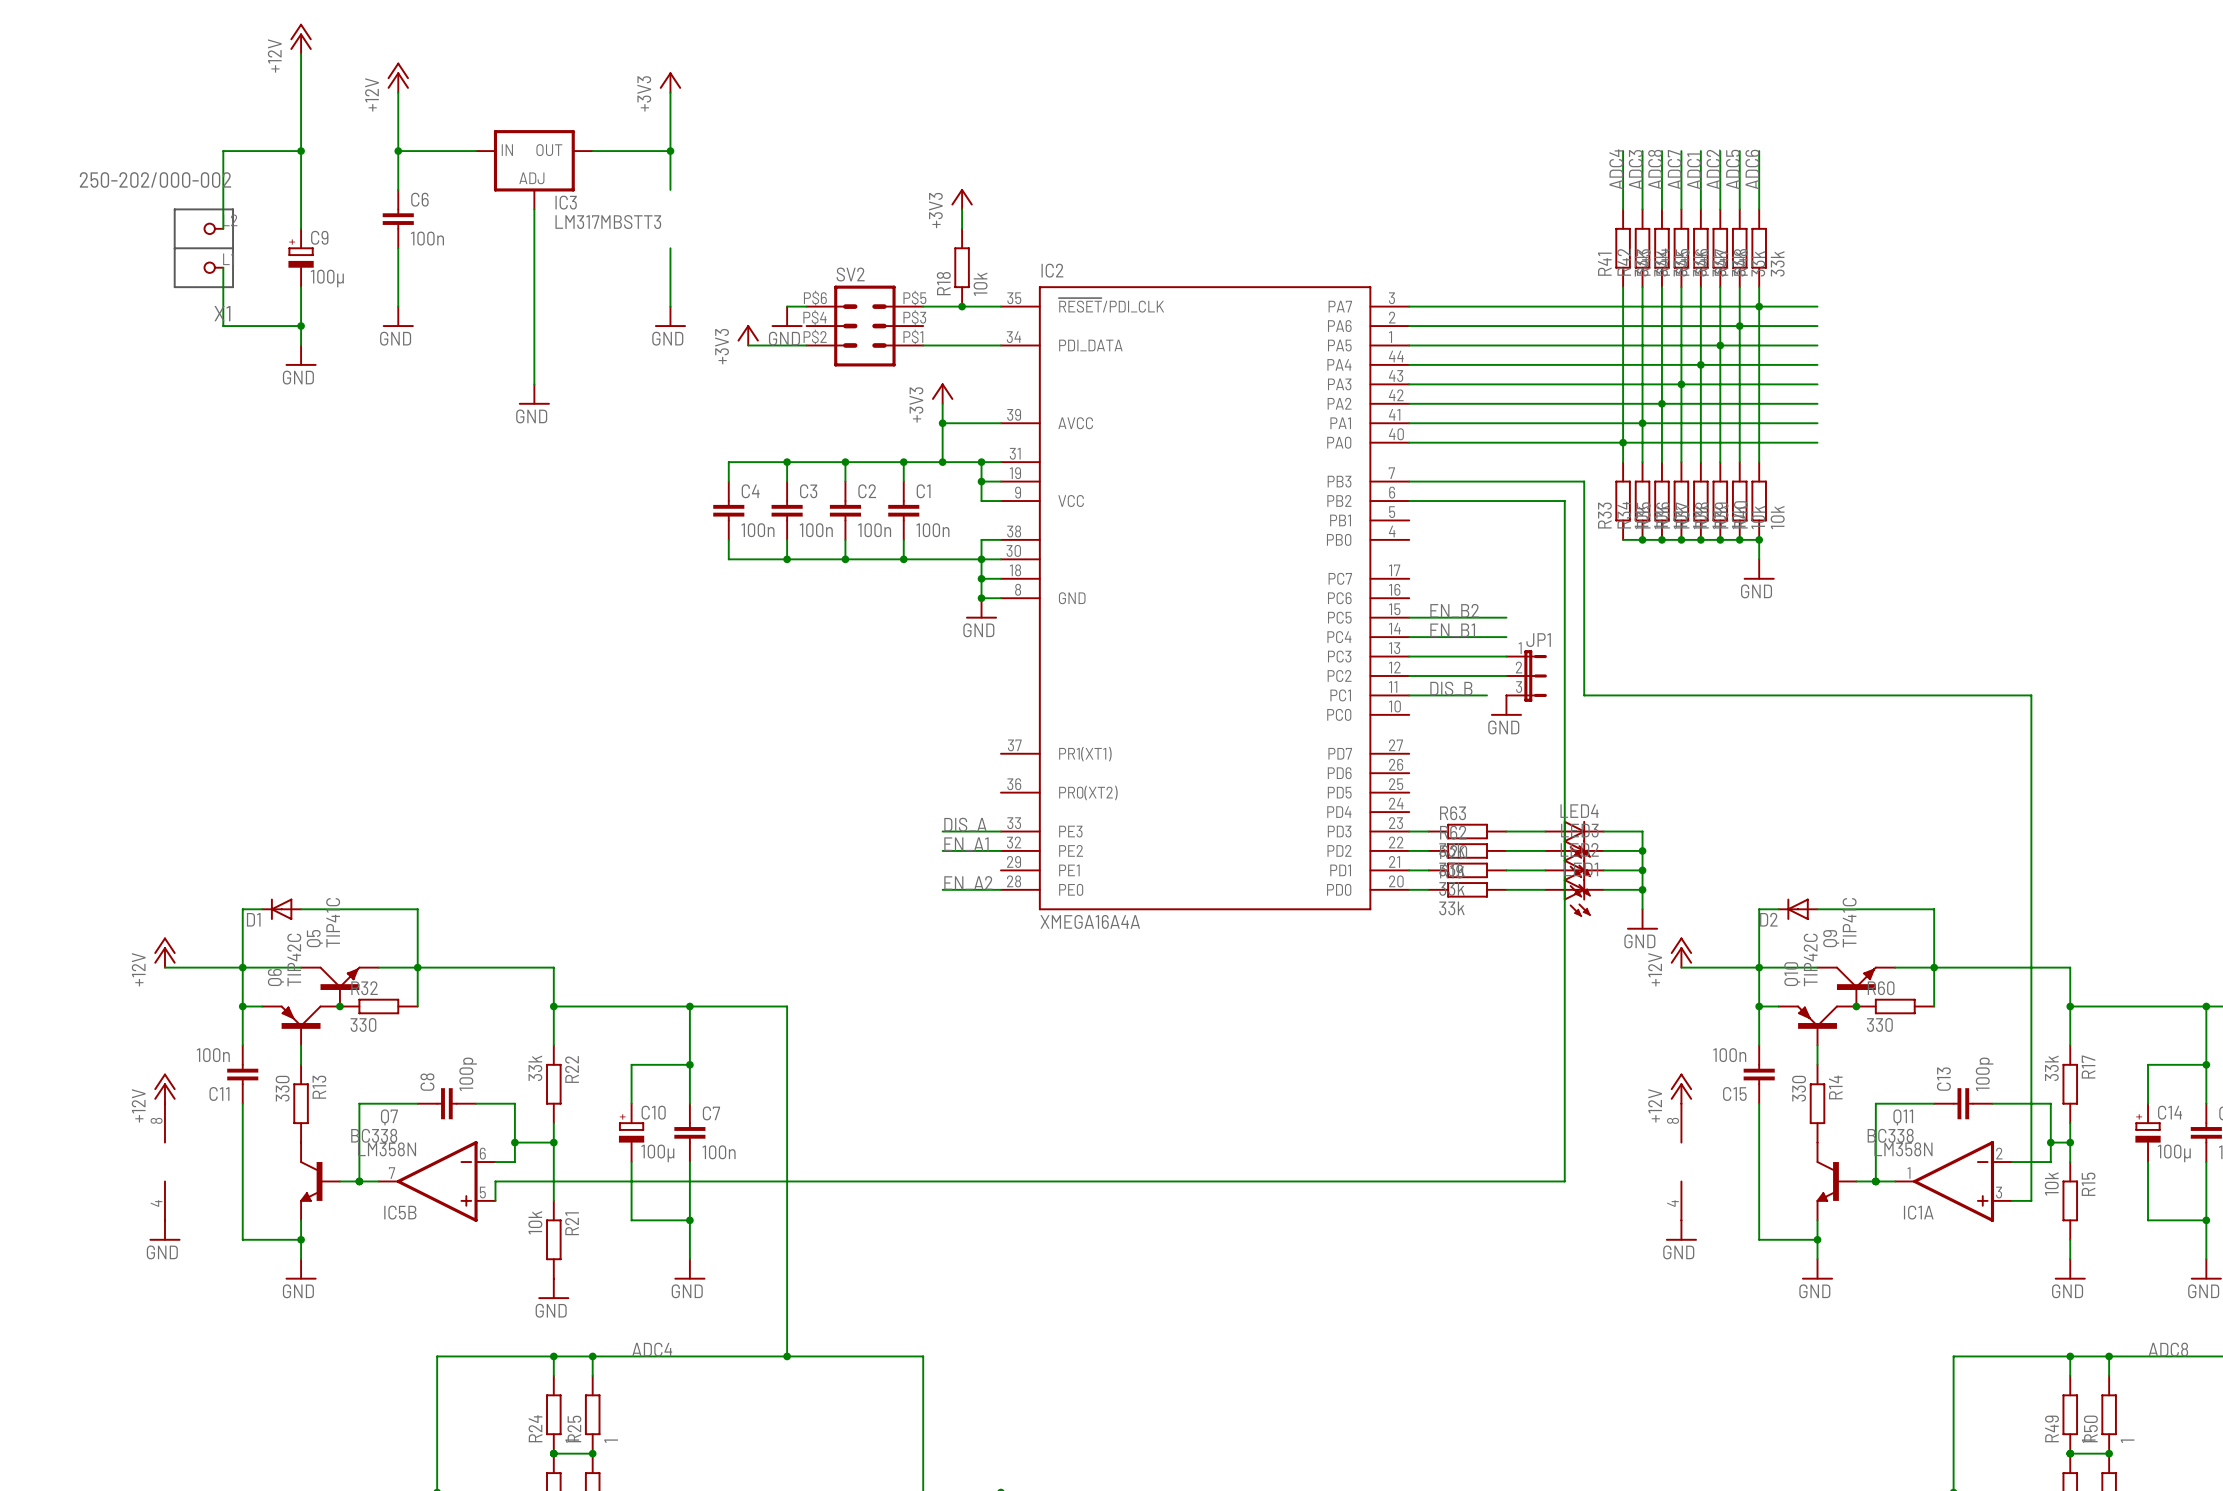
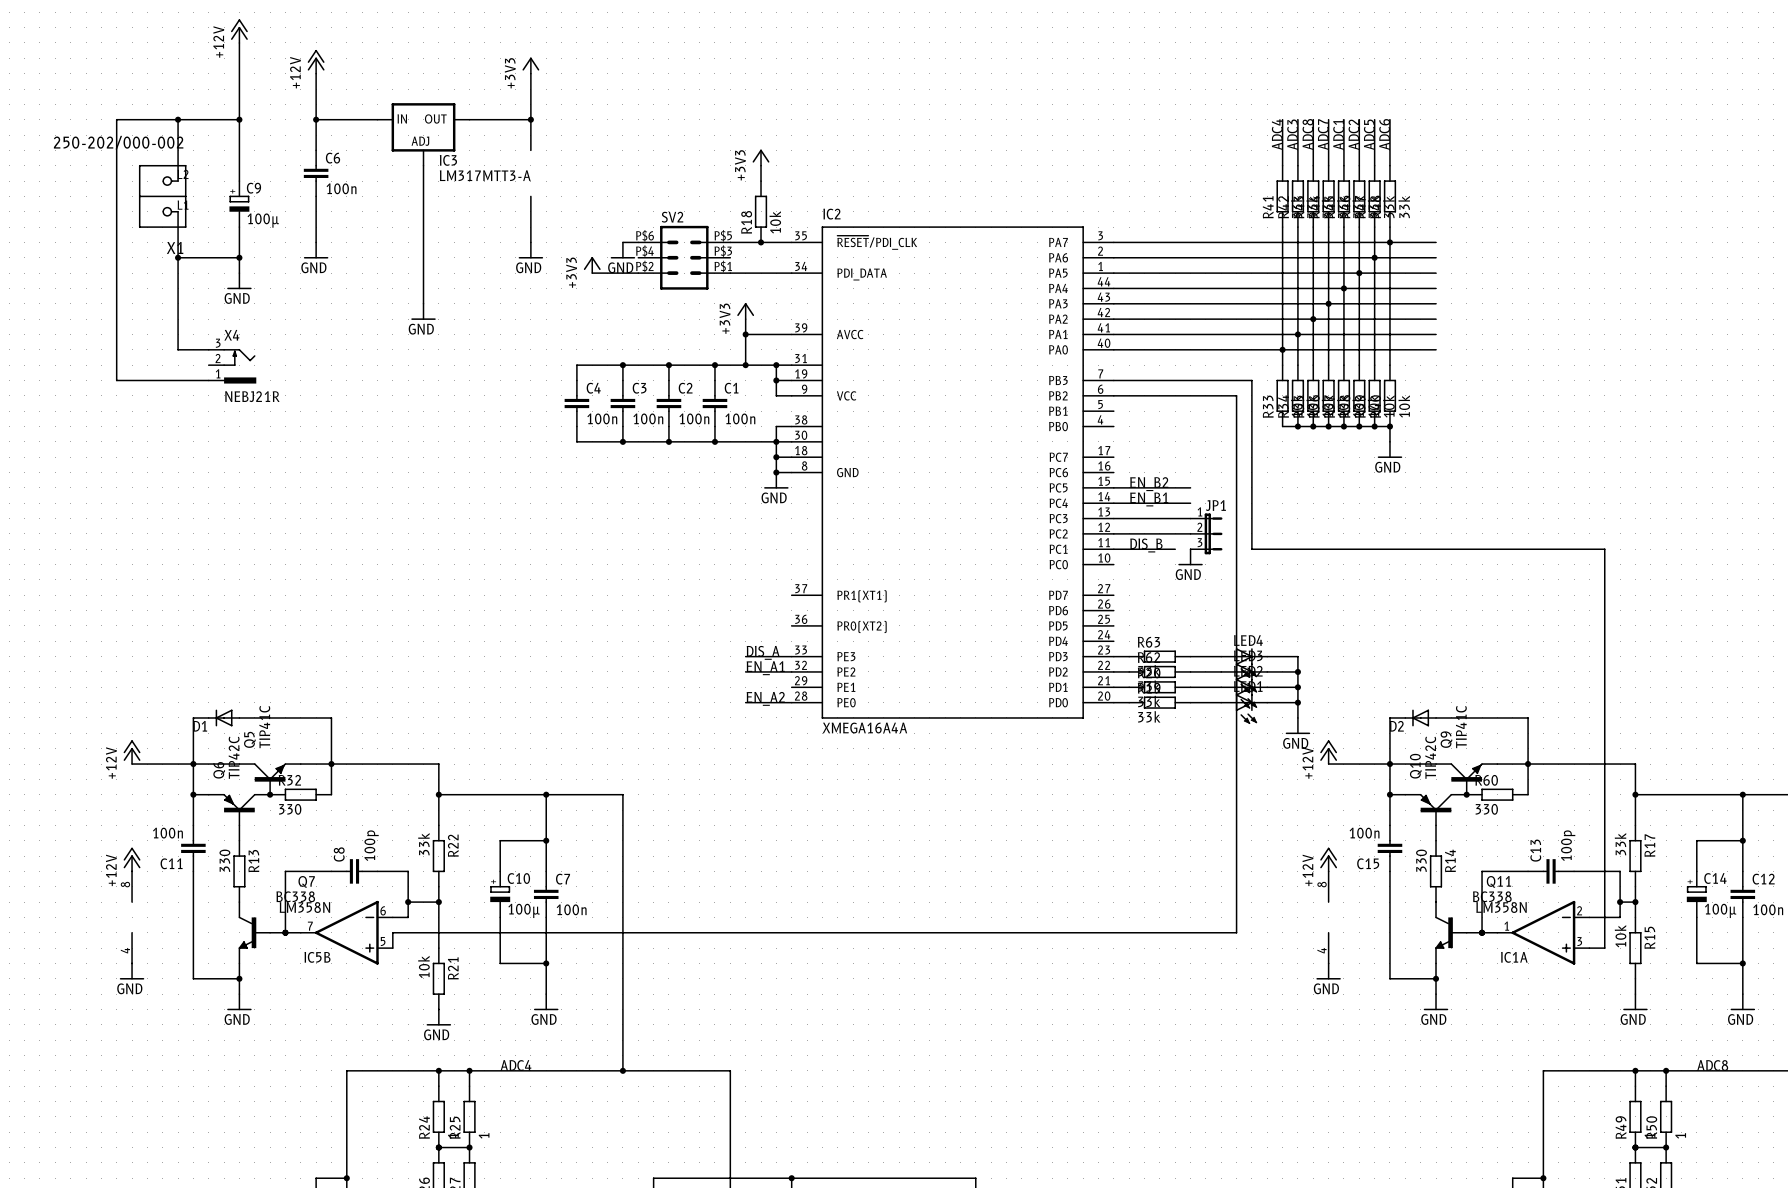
wire: none -> (178, 119) (116, 119) (116, 380) (208, 380)
junction: none -> (178, 119)
IC3 value: LM317MBSTT3 (608, 222) -> LM317MTT3-A (485, 175)
wire: none -> (178, 257) (178, 349) (208, 349)
junction: none -> (178, 257)
X4: none -> NEBJ21R (232, 366)

